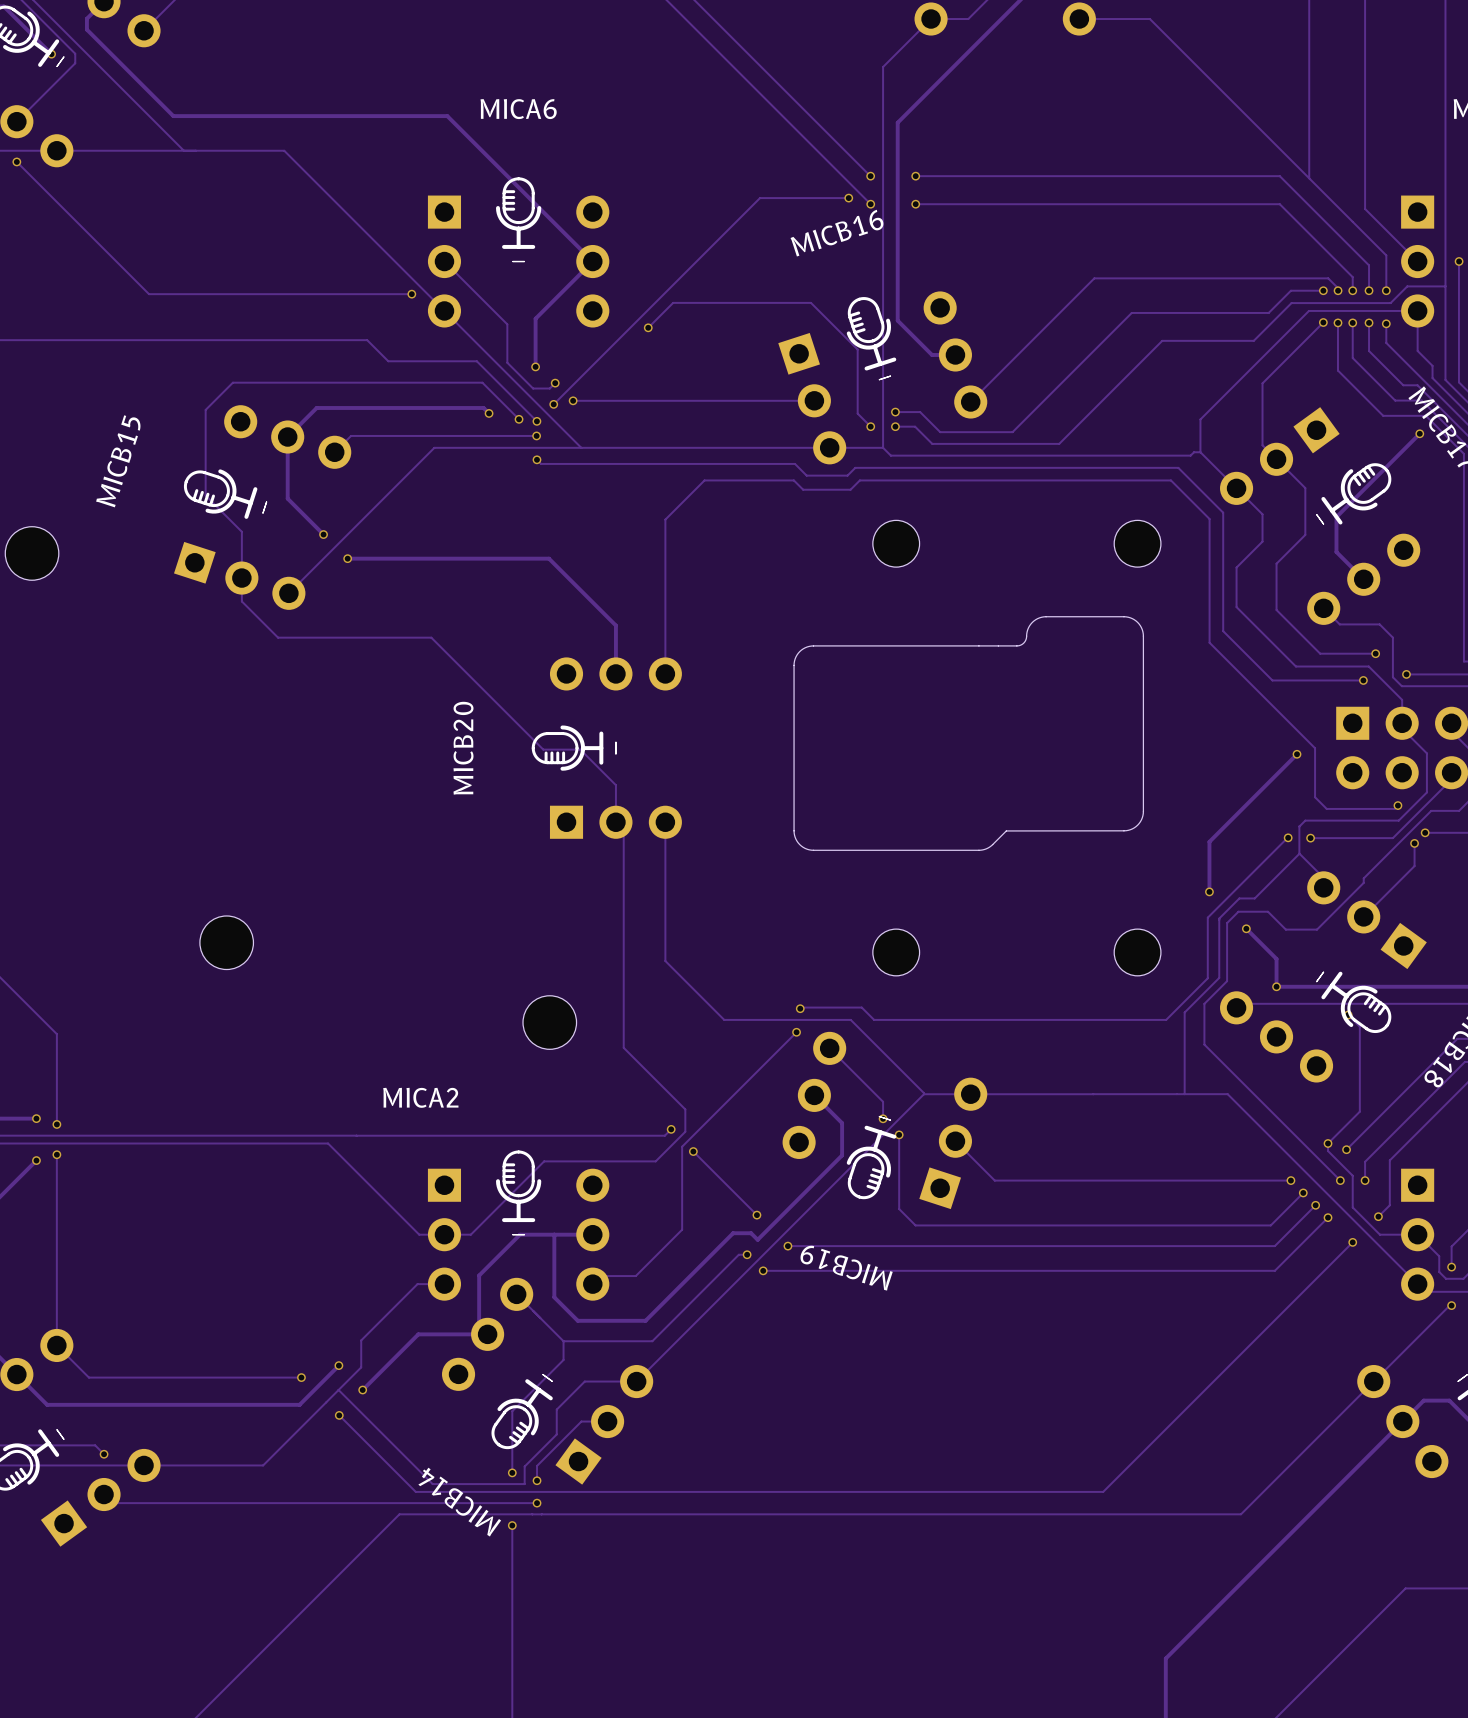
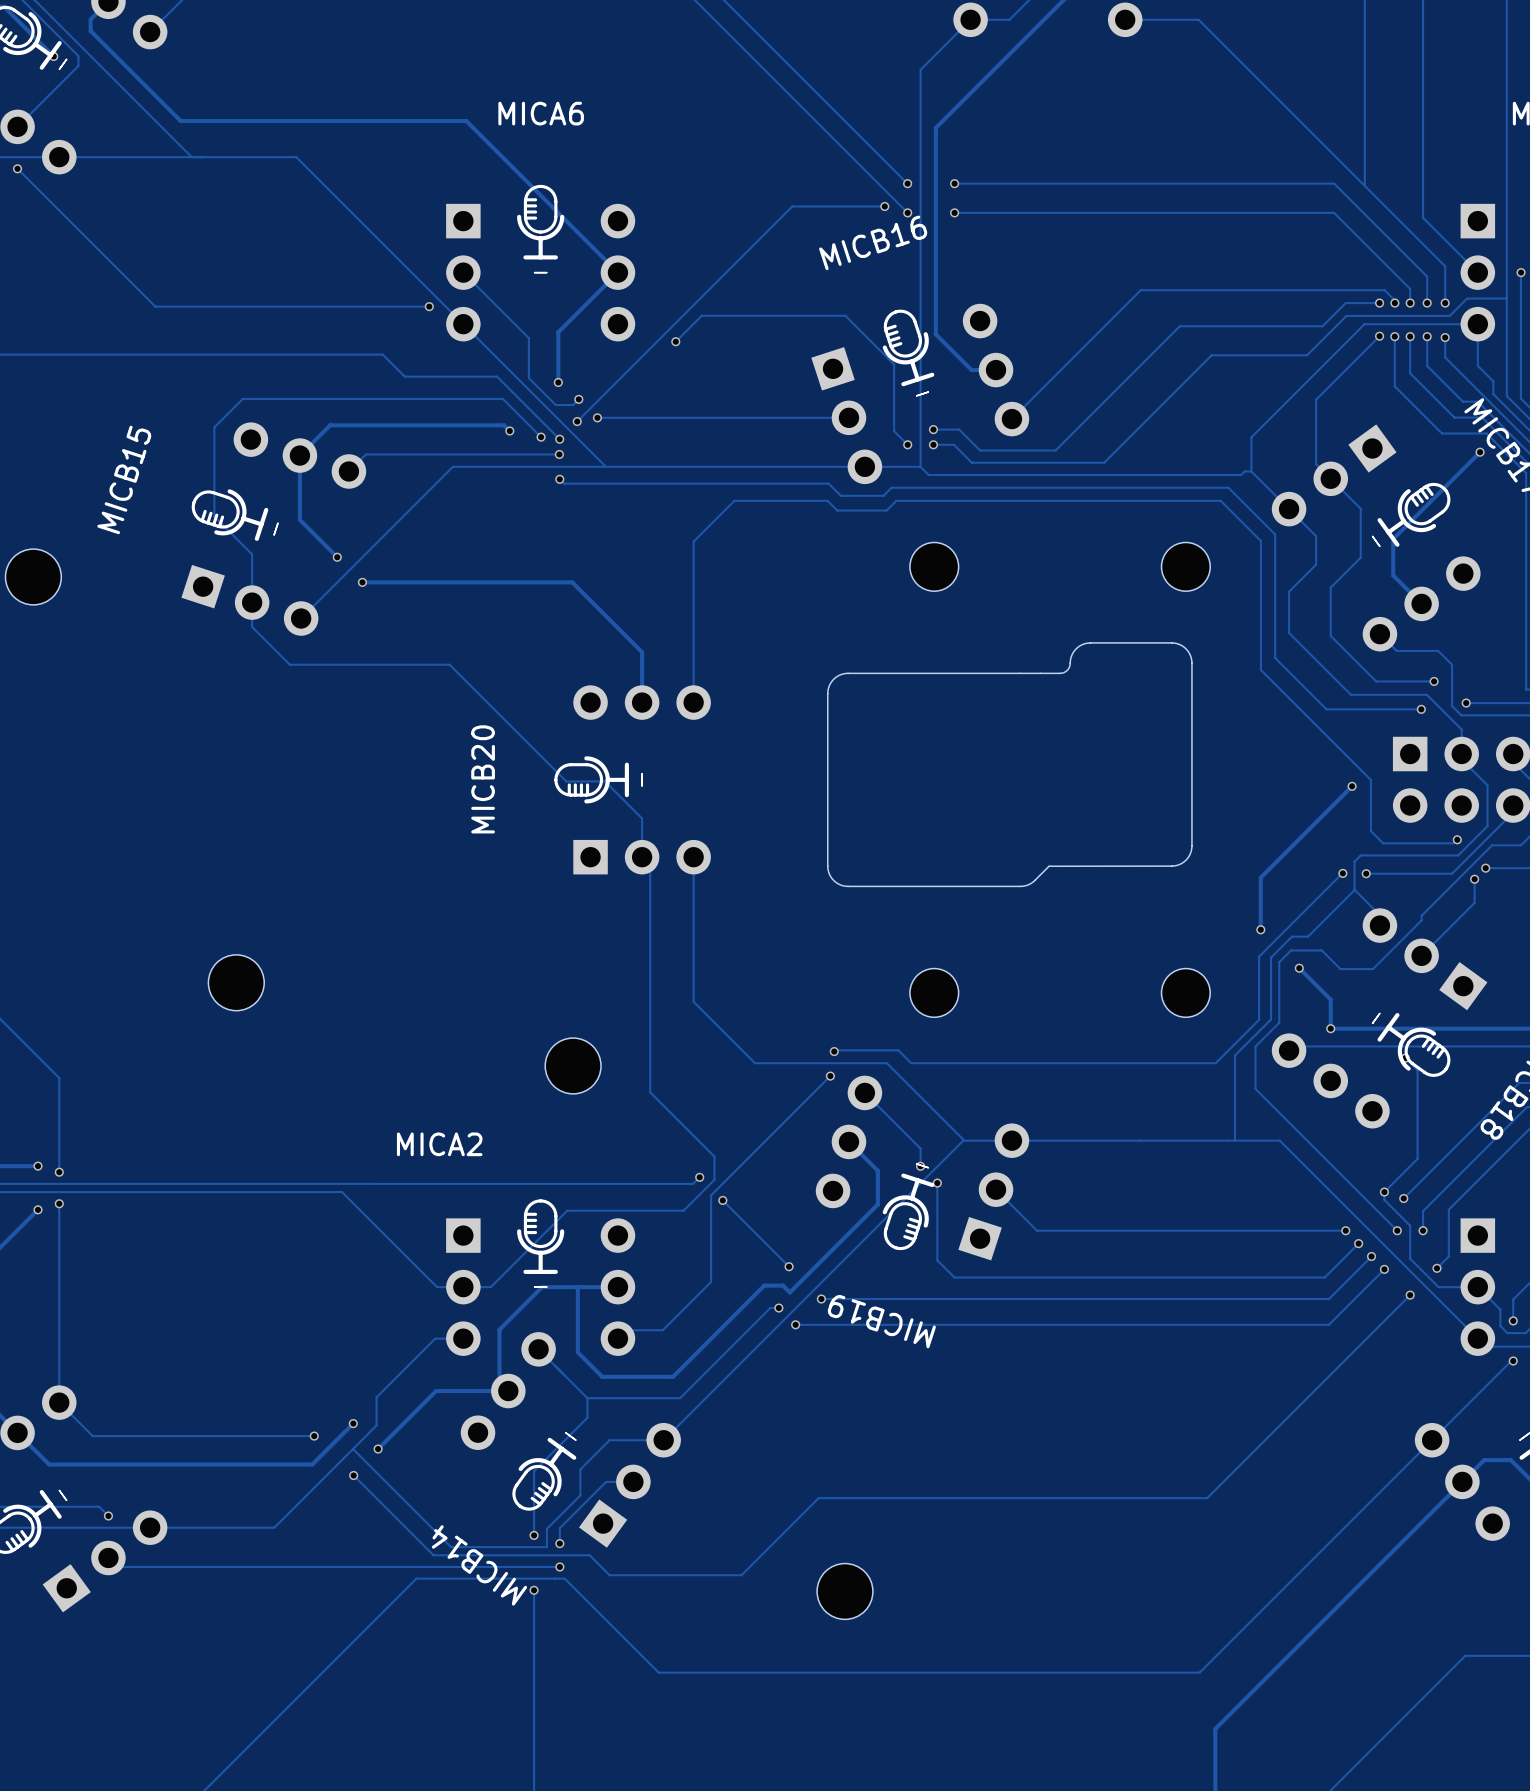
track: (1158, 1437) (1103, 1491) (565, 1491) -> (1207, 1498) (818, 1498) (741, 1575) (609, 1575) (589, 1555)
track: (541, 1514) (1240, 1514) -> (564, 1578) (658, 1672) (1199, 1672) (1293, 1578)
part: none -> (845, 1591)

